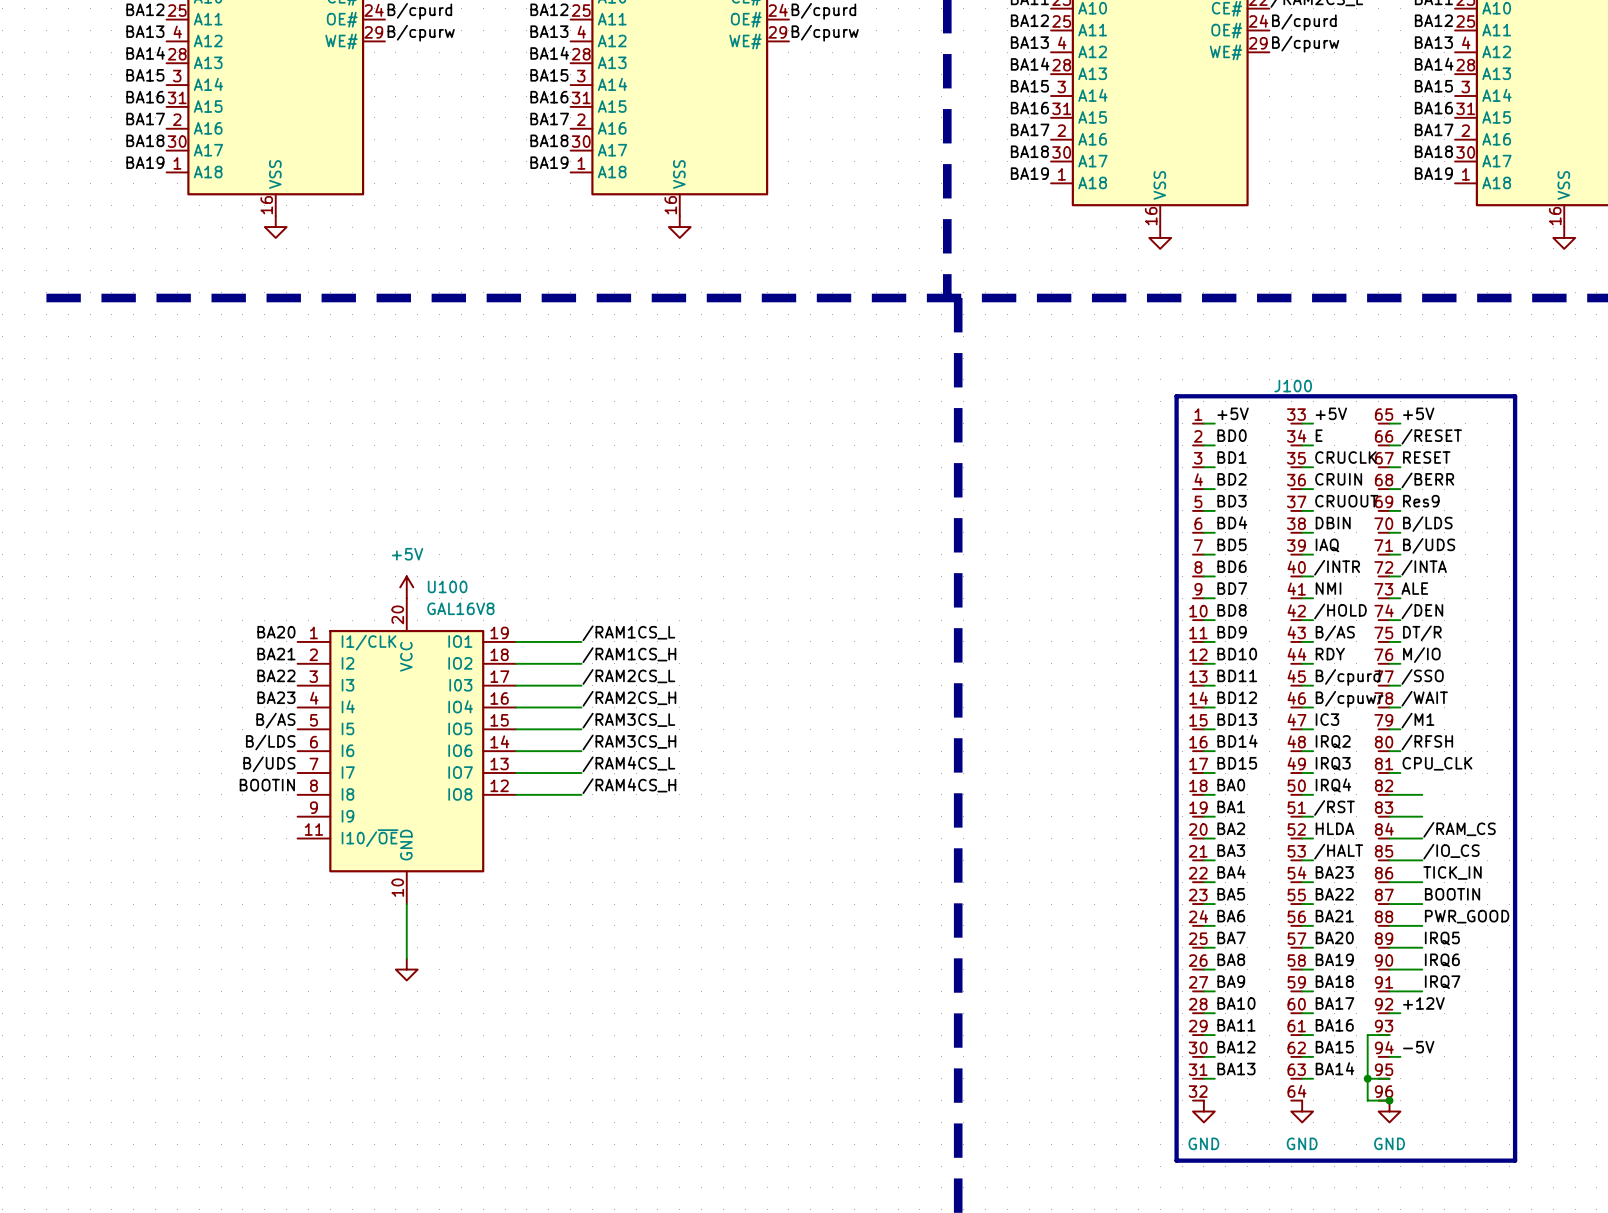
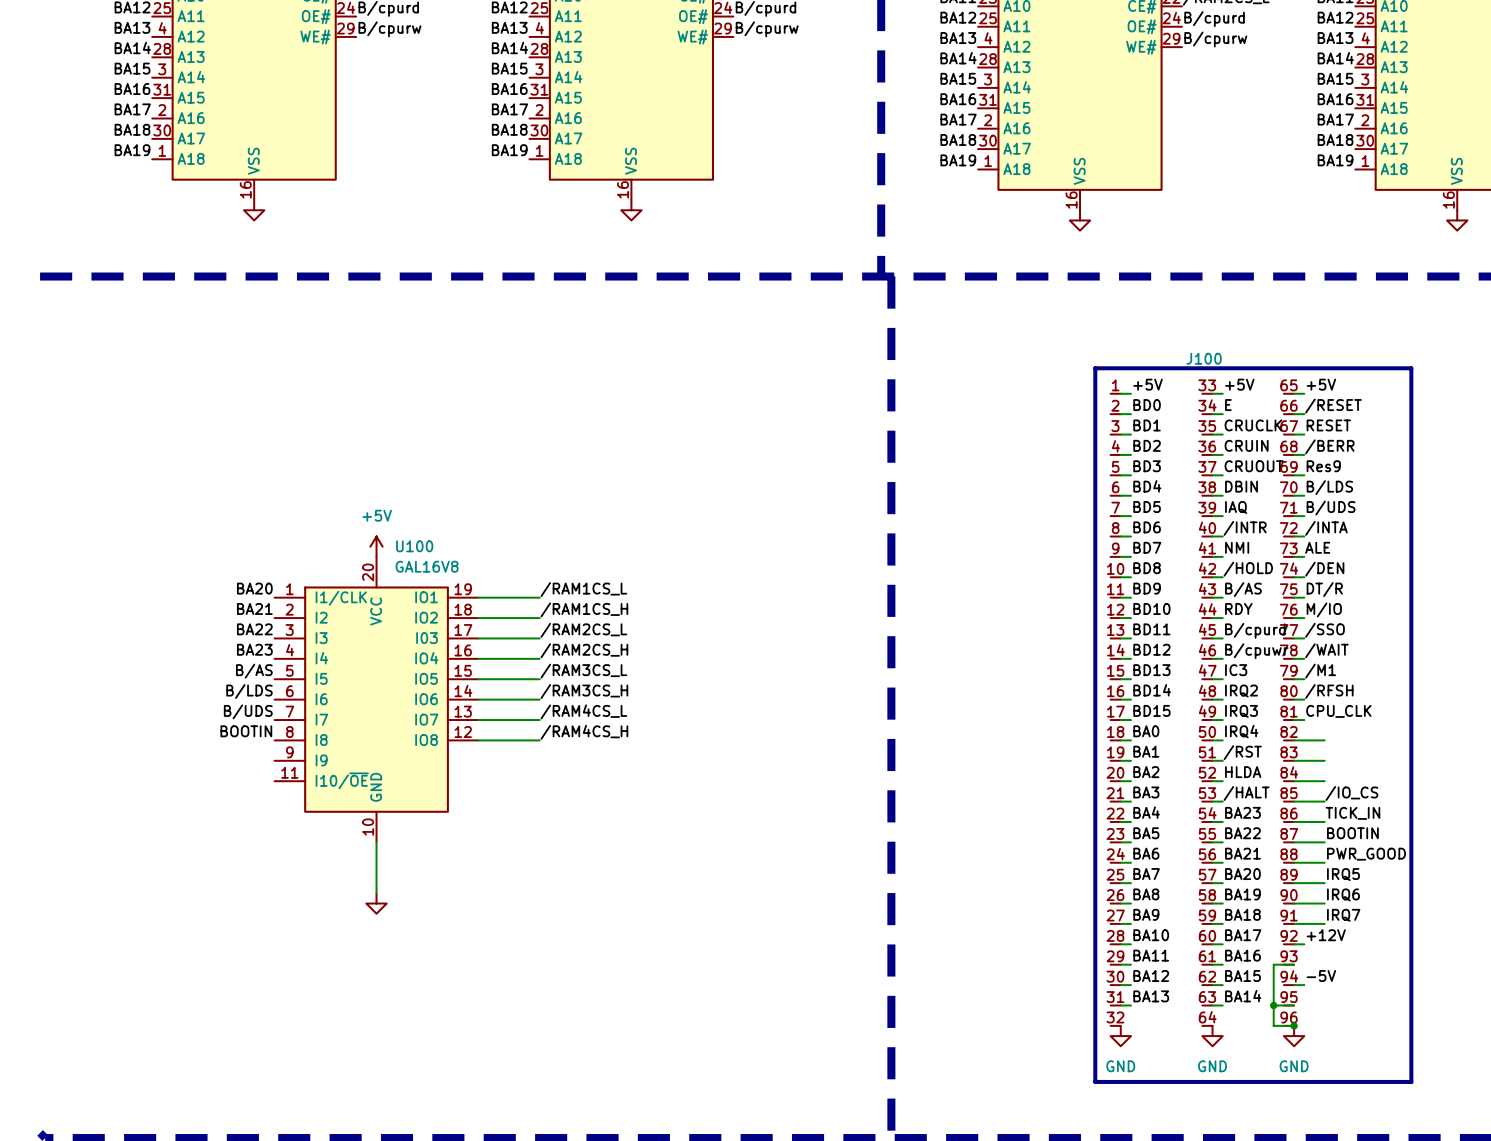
label: /RAM_CS (1459, 829) -> none

